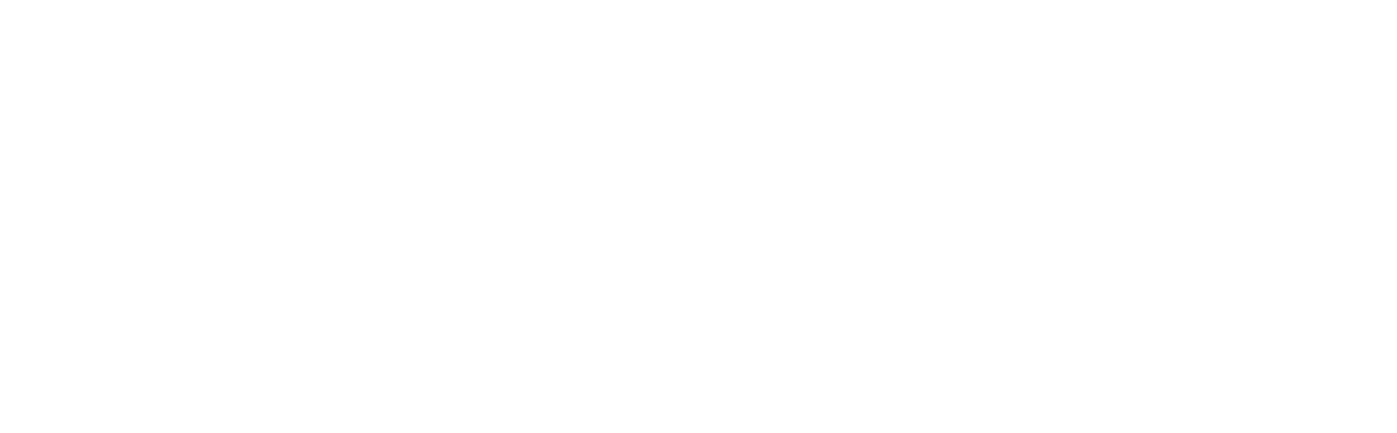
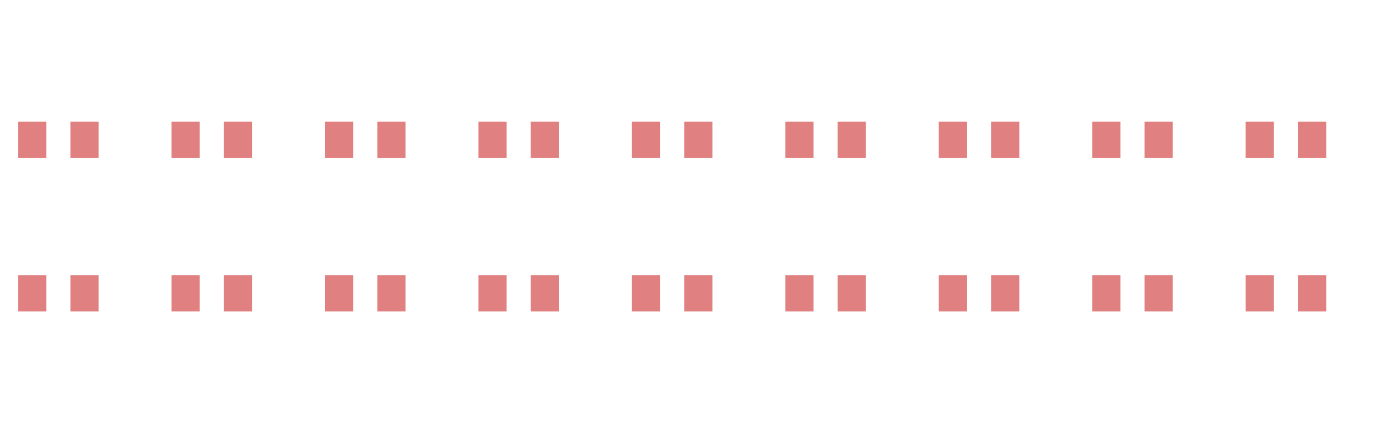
part: none -> (58, 139)
part: none -> (211, 139)
part: none -> (365, 139)
part: none -> (518, 139)
part: none -> (672, 139)
part: none -> (825, 139)
part: none -> (979, 139)
part: none -> (1132, 139)
part: none -> (1285, 139)
part: none -> (58, 293)
part: none -> (211, 293)
part: none -> (365, 293)
part: none -> (518, 293)
part: none -> (672, 293)
part: none -> (825, 293)
part: none -> (979, 293)
part: none -> (1132, 293)
part: none -> (1285, 293)

